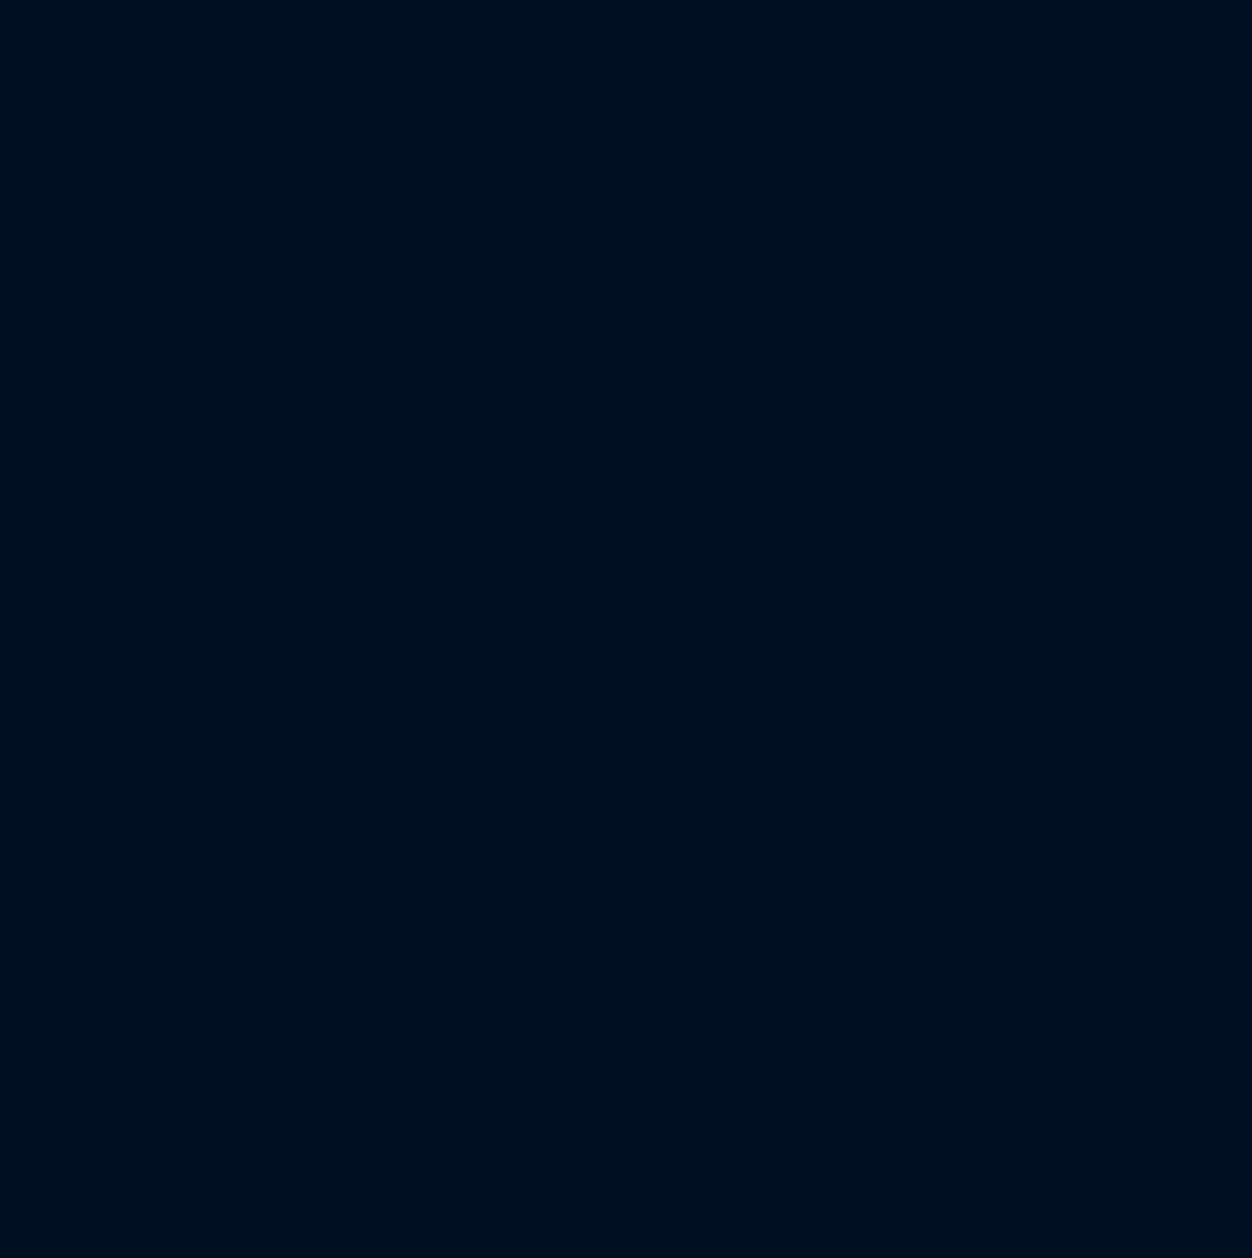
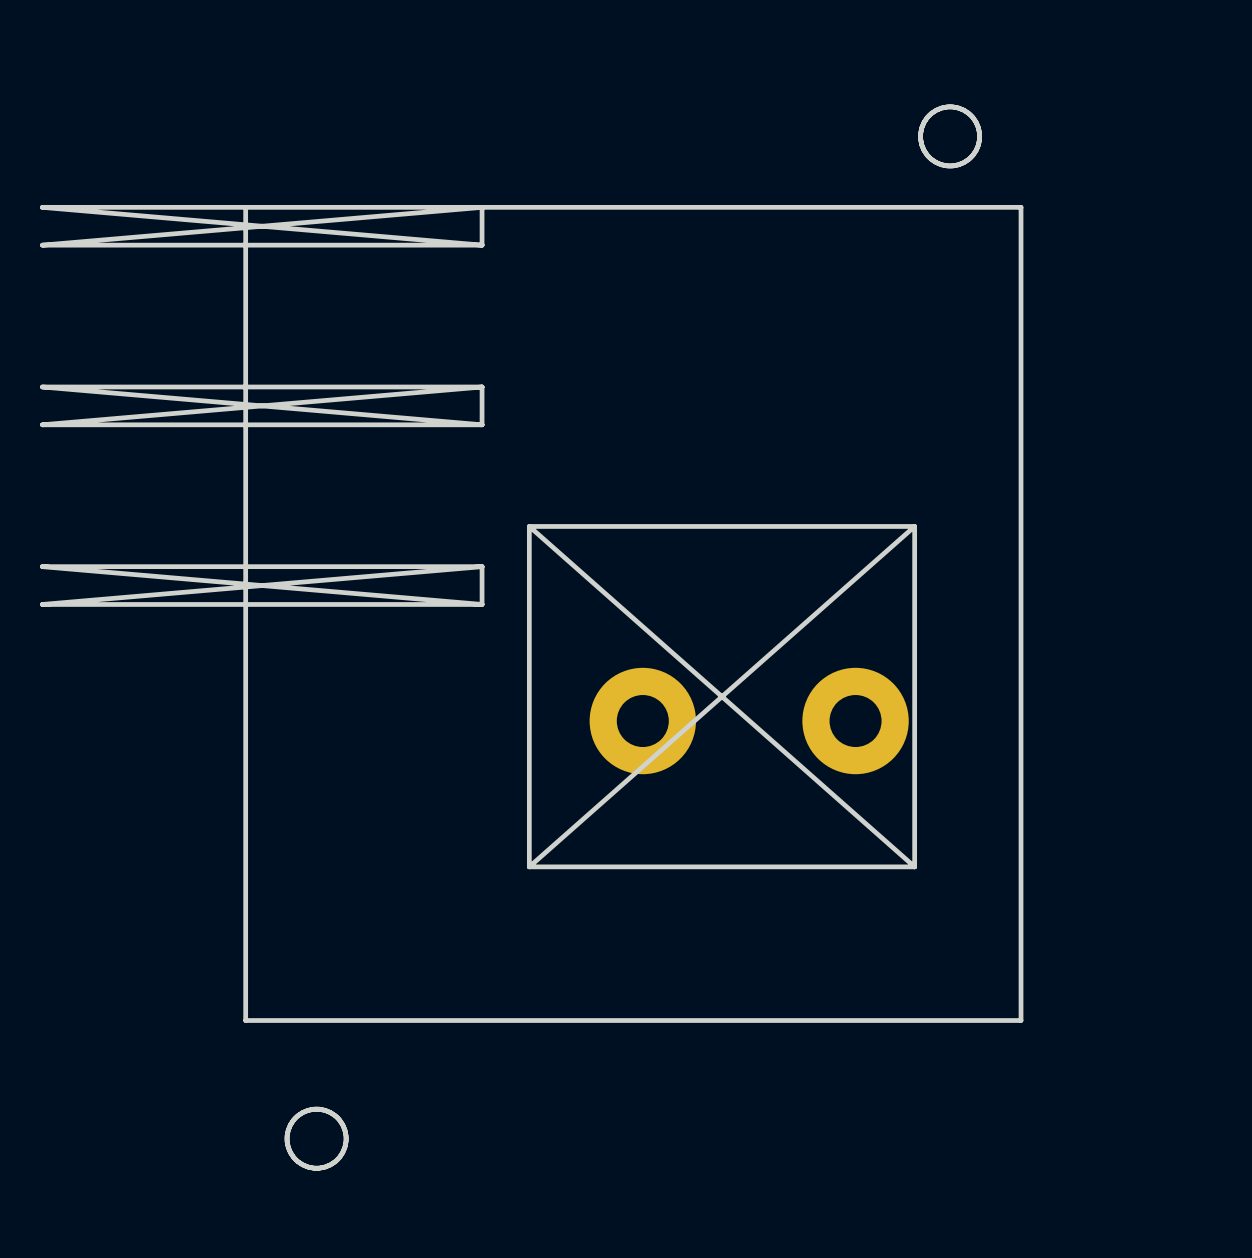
round board edge: none -> [918, 104, 983, 169]
board edge: none -> (245, 207) (245, 1020) (1021, 1020) (1021, 207) (42, 207) (482, 245)
board edge: none -> (482, 245) (482, 207) (42, 245) (482, 245)
board edge: none -> (482, 386) (482, 424)
board edge: none -> (482, 386) (42, 386) (482, 424)
board edge: none -> (482, 386) (42, 424) (482, 424)
board edge: none -> (529, 526) (529, 866)
board edge: none -> (529, 526) (914, 526)
board edge: none -> (529, 526) (914, 866)
board edge: none -> (914, 526) (914, 866)
board edge: none -> (914, 526) (529, 866)
board edge: none -> (482, 566) (482, 604)
board edge: none -> (482, 566) (42, 566) (482, 604)
board edge: none -> (482, 566) (42, 604) (482, 604)
part: none -> (642, 721)
part: none -> (855, 721)
board edge: none -> (529, 866) (914, 866)
round board edge: none -> [284, 1106, 349, 1171]

